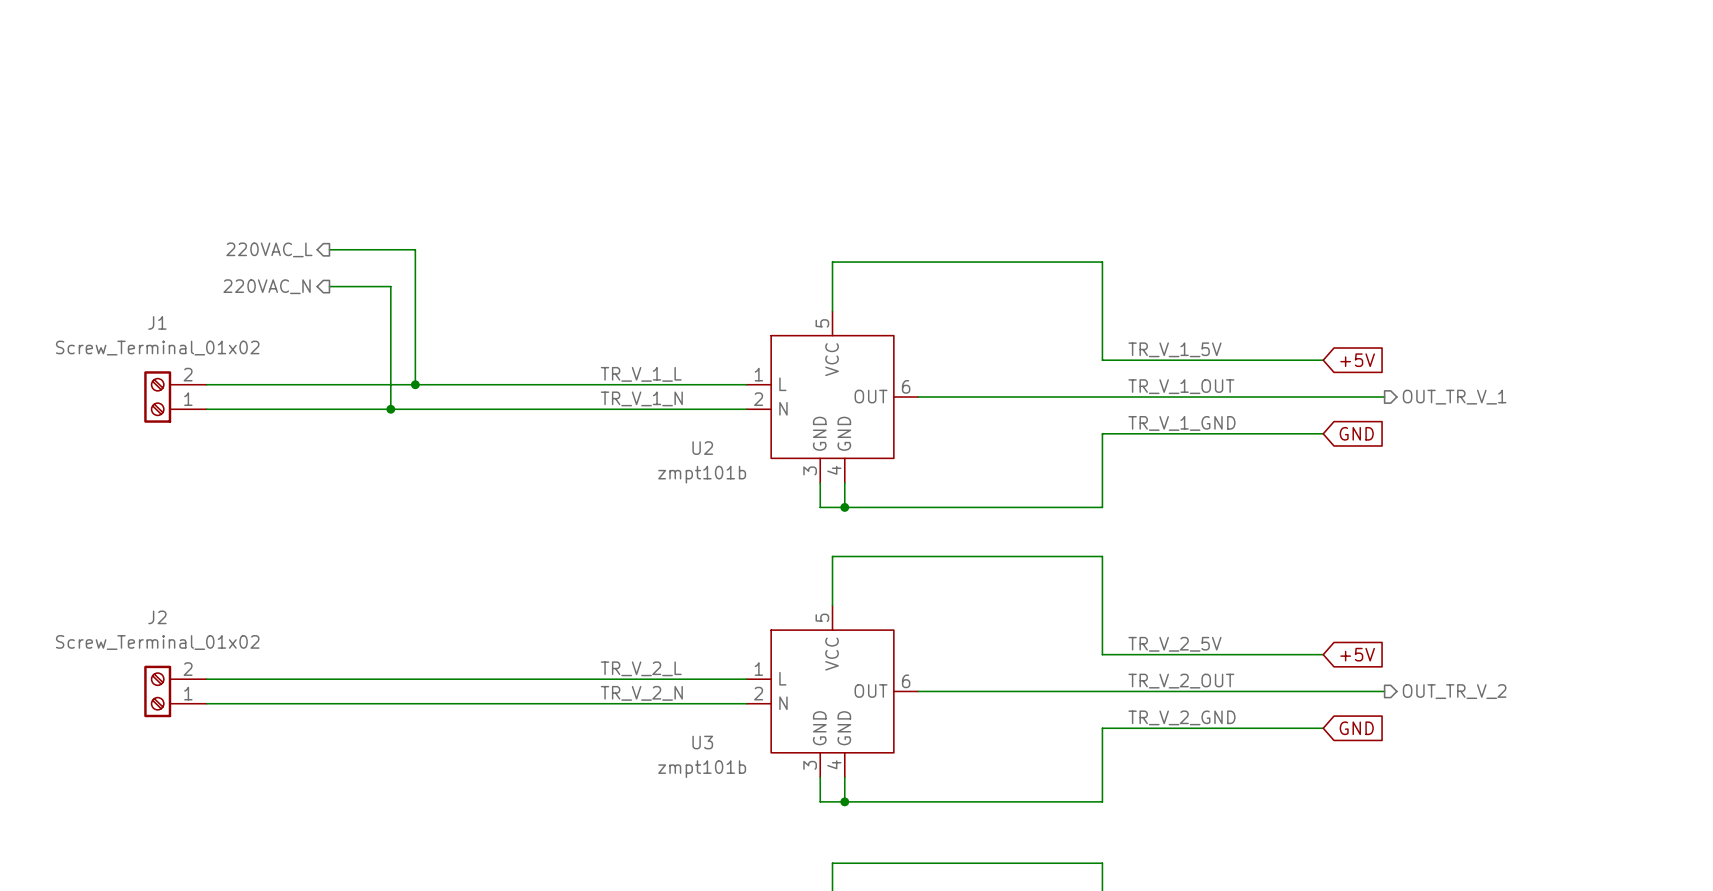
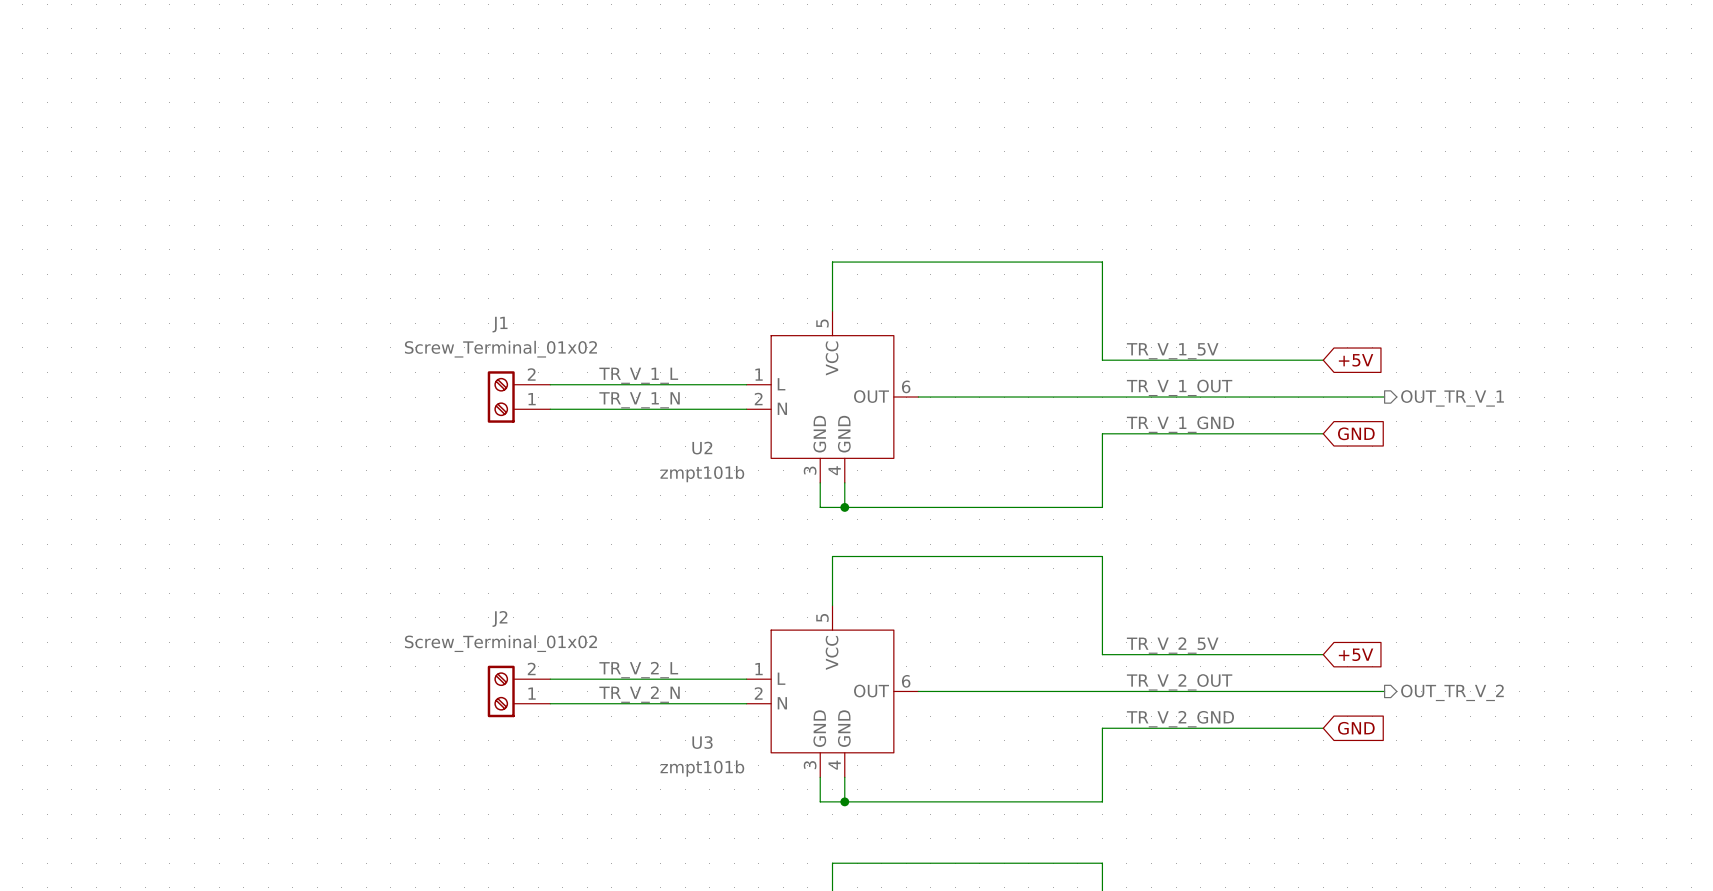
hierarchical label: 220VAC_L (269, 249) -> none
wire: (329, 249) (415, 249) (415, 384) -> none
hierarchical label: 220VAC_N (267, 286) -> none
wire: (329, 286) (390, 286) (390, 409) -> none
wire: (206, 384) (550, 384) -> none
junction: (415, 384) -> none
J1 position: (175, 397) -> (519, 397)
wire: (206, 409) (550, 409) -> none
junction: (390, 409) -> none
wire: (206, 679) (550, 679) -> none
J2 position: (175, 691) -> (519, 691)
wire: (206, 703) (550, 703) -> none

